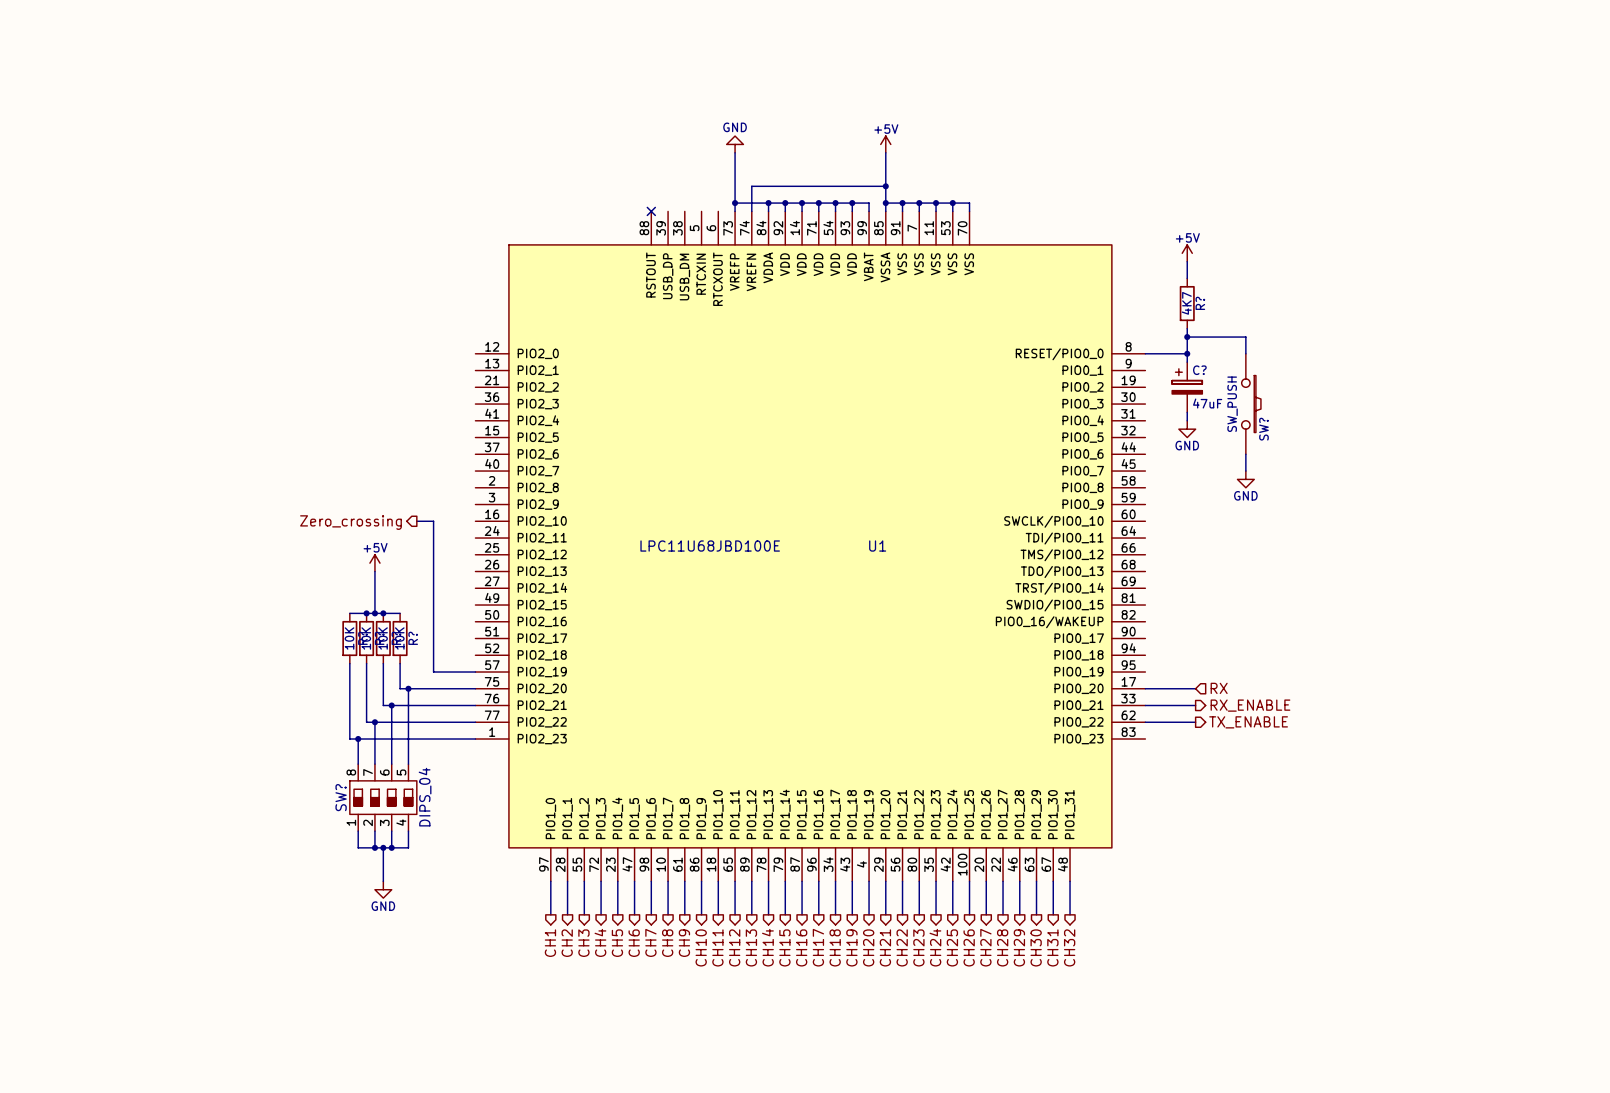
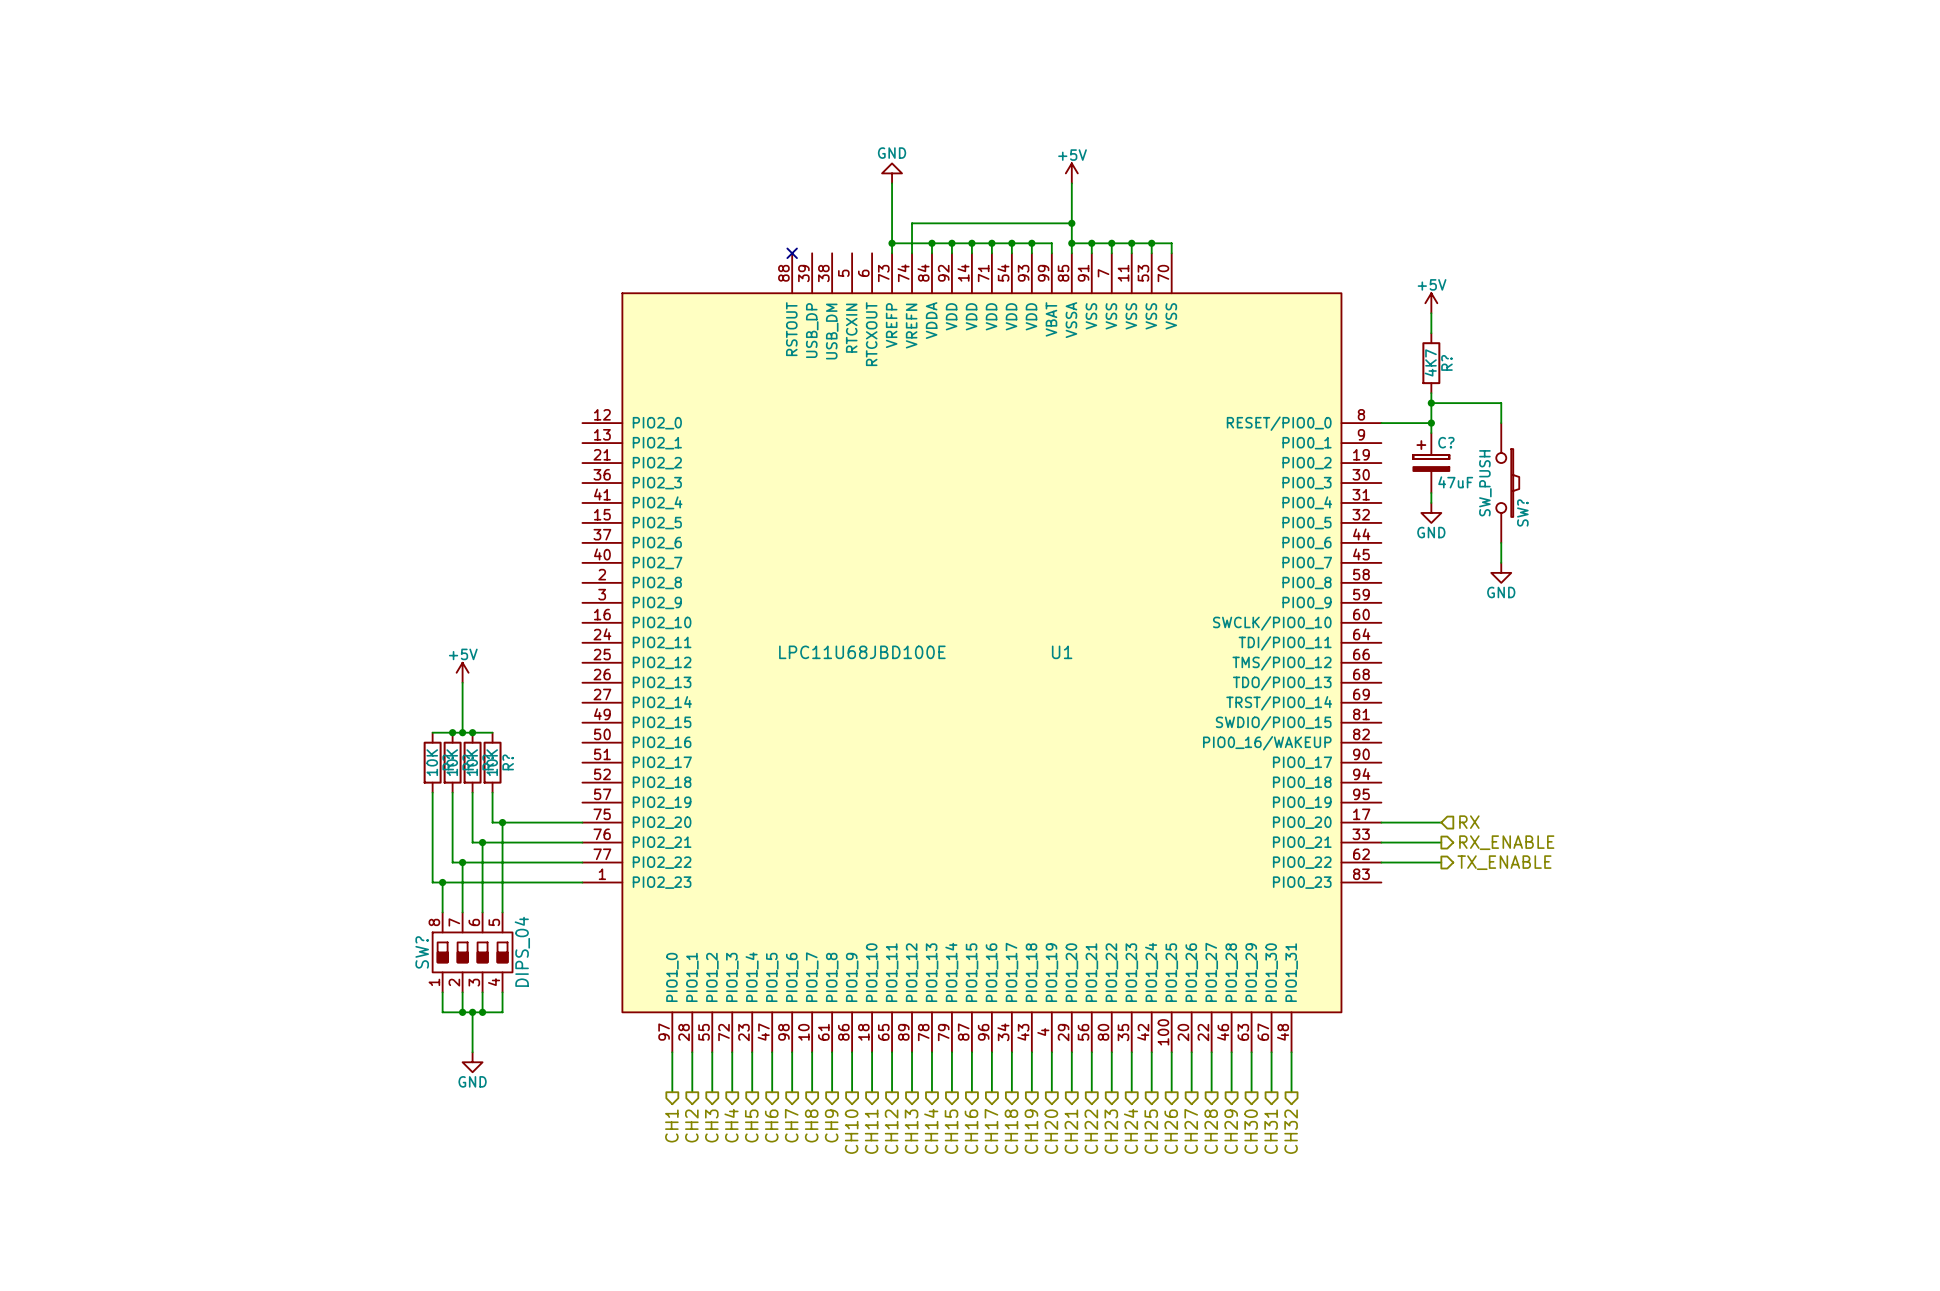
wire: (416, 521) (433, 521) (433, 672) (475, 672) -> none
hierarchical label: Zero_crossing (350, 522) -> none

